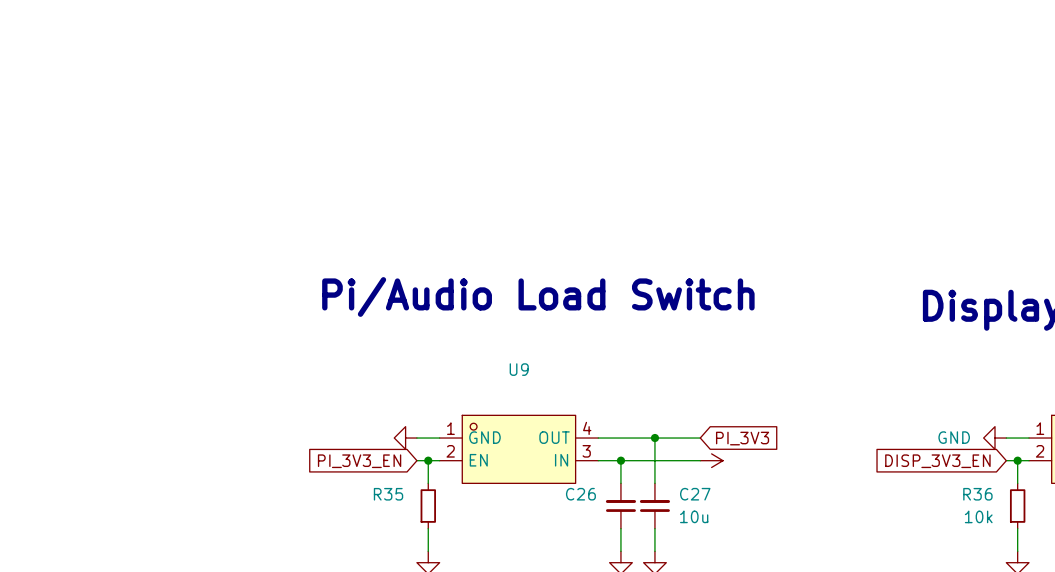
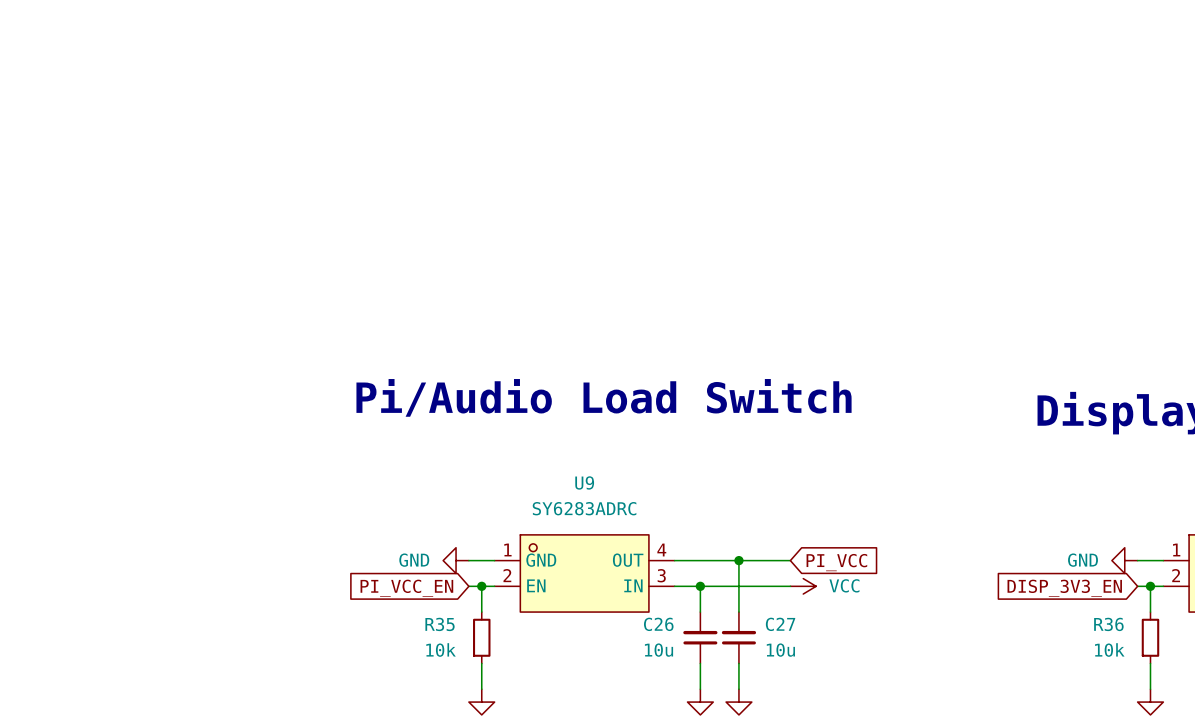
U9 value: none -> SY6283ADRC (584, 508)
power symbol text: none -> GND (414, 560)
global label: PI_3V3 (742, 438) -> PI_VCC (836, 562)
power symbol text: none -> VCC (844, 585)
global label: PI_3V3_EN (359, 461) -> PI_VCC_EN (406, 588)
R35 value: none -> 10k (441, 650)
C26 value: none -> 10u (659, 650)

